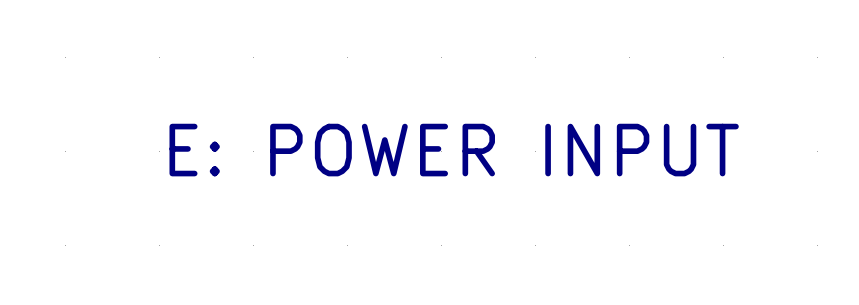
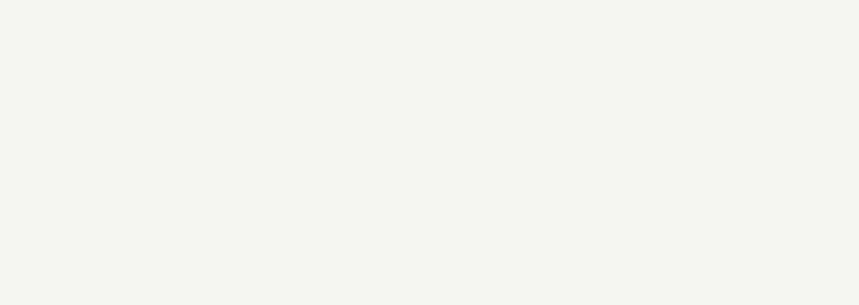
text: E: POWER INPUT (454, 150) -> none

